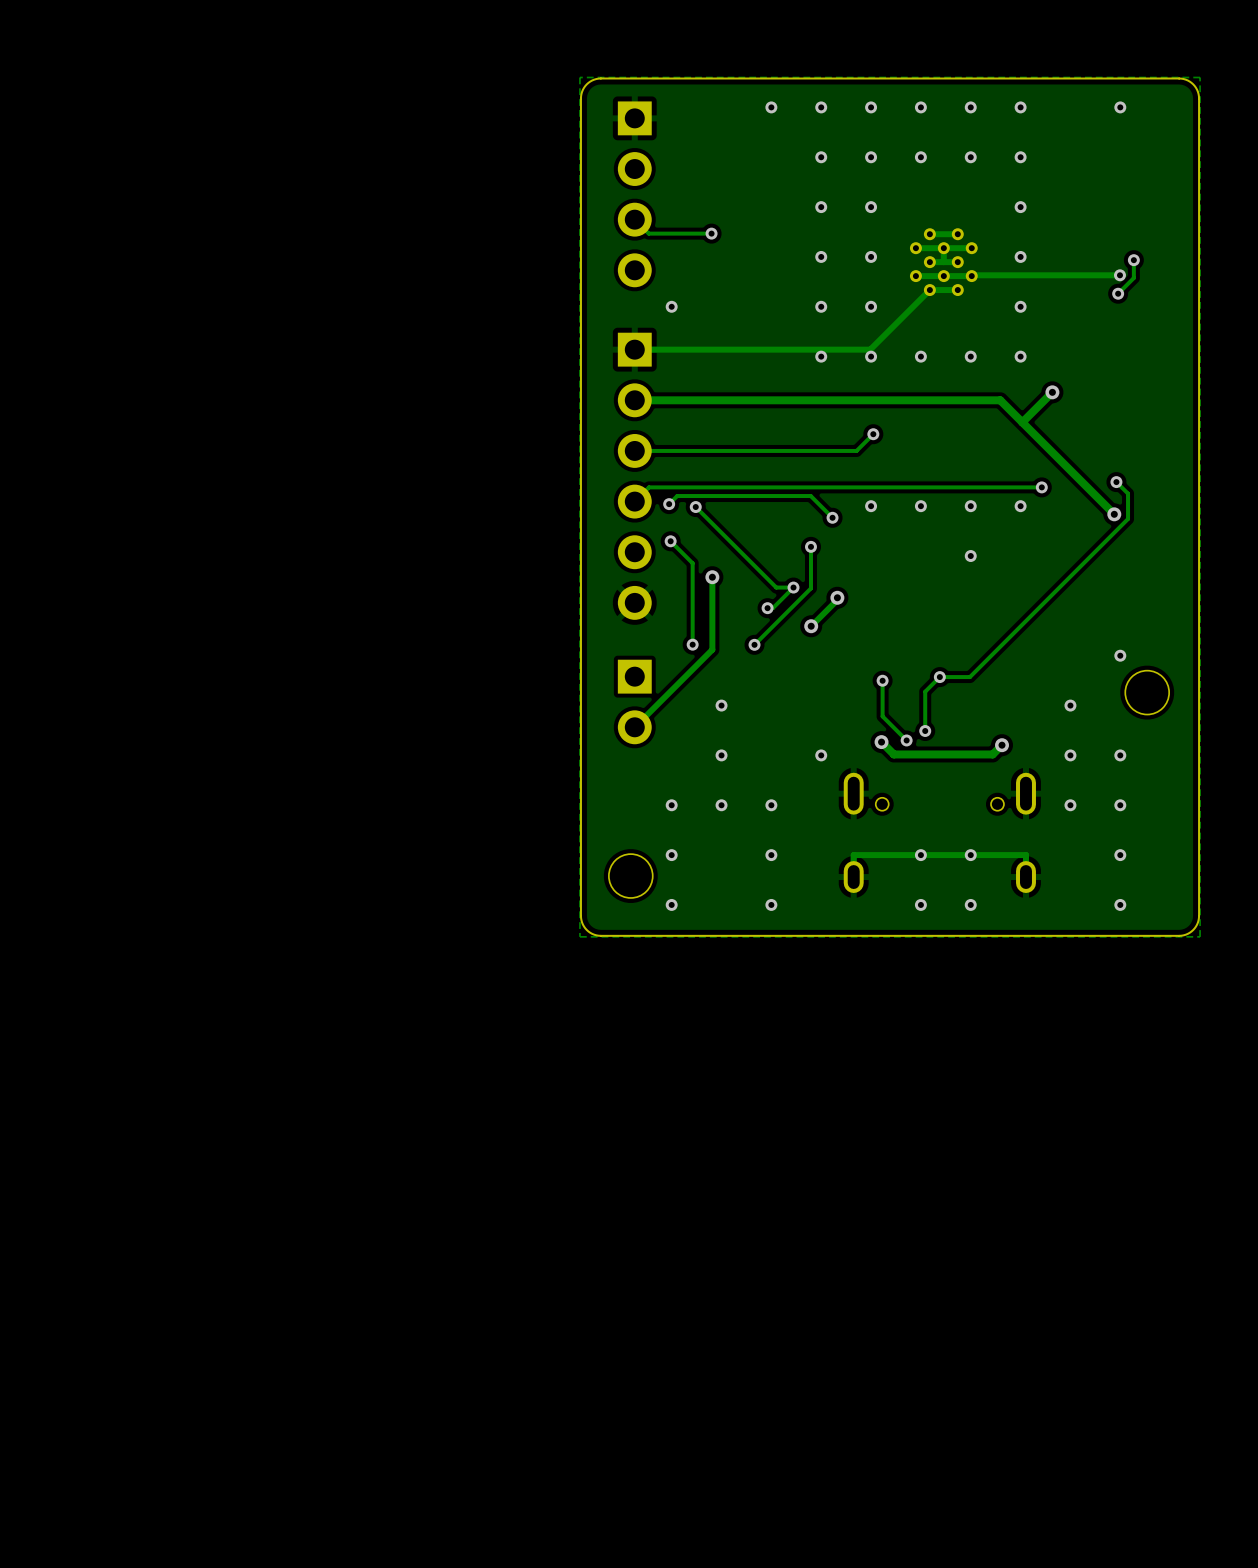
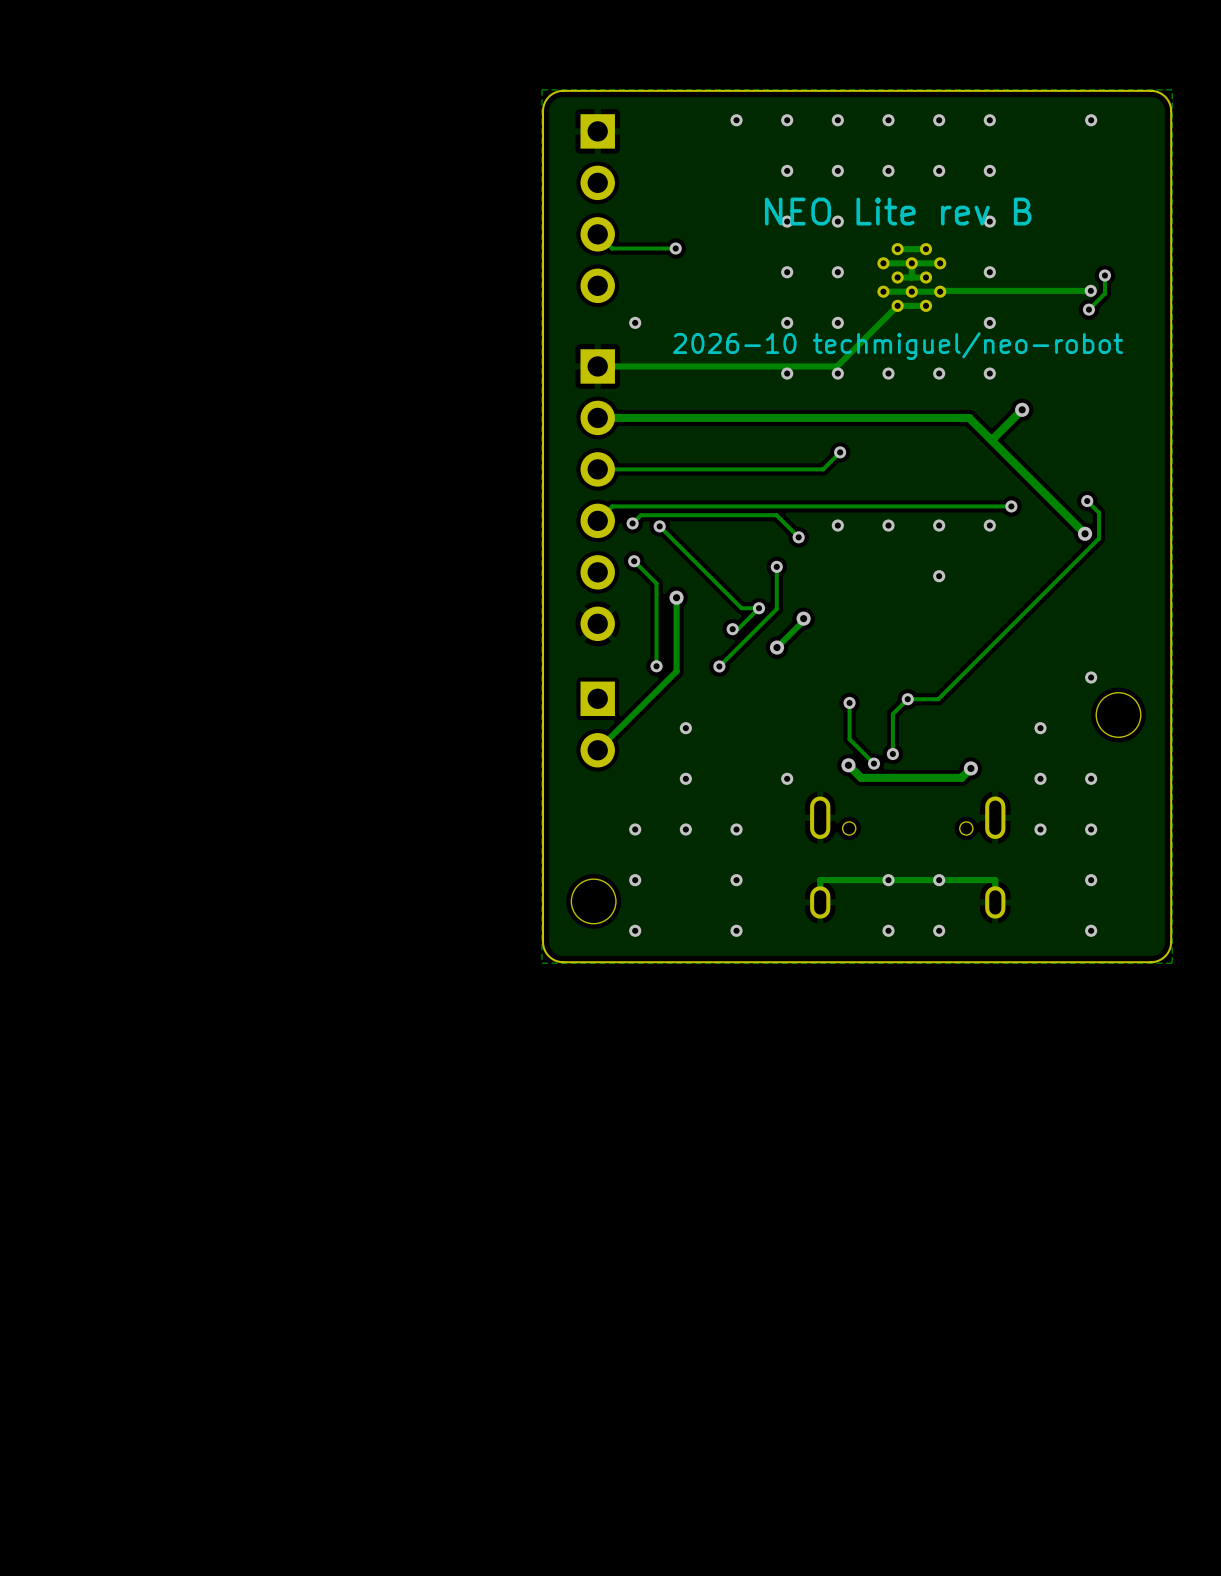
text: none -> NEO Lite rev B (898, 211)
text: none -> 2026-10 techmiguel/neo-robot (898, 346)

